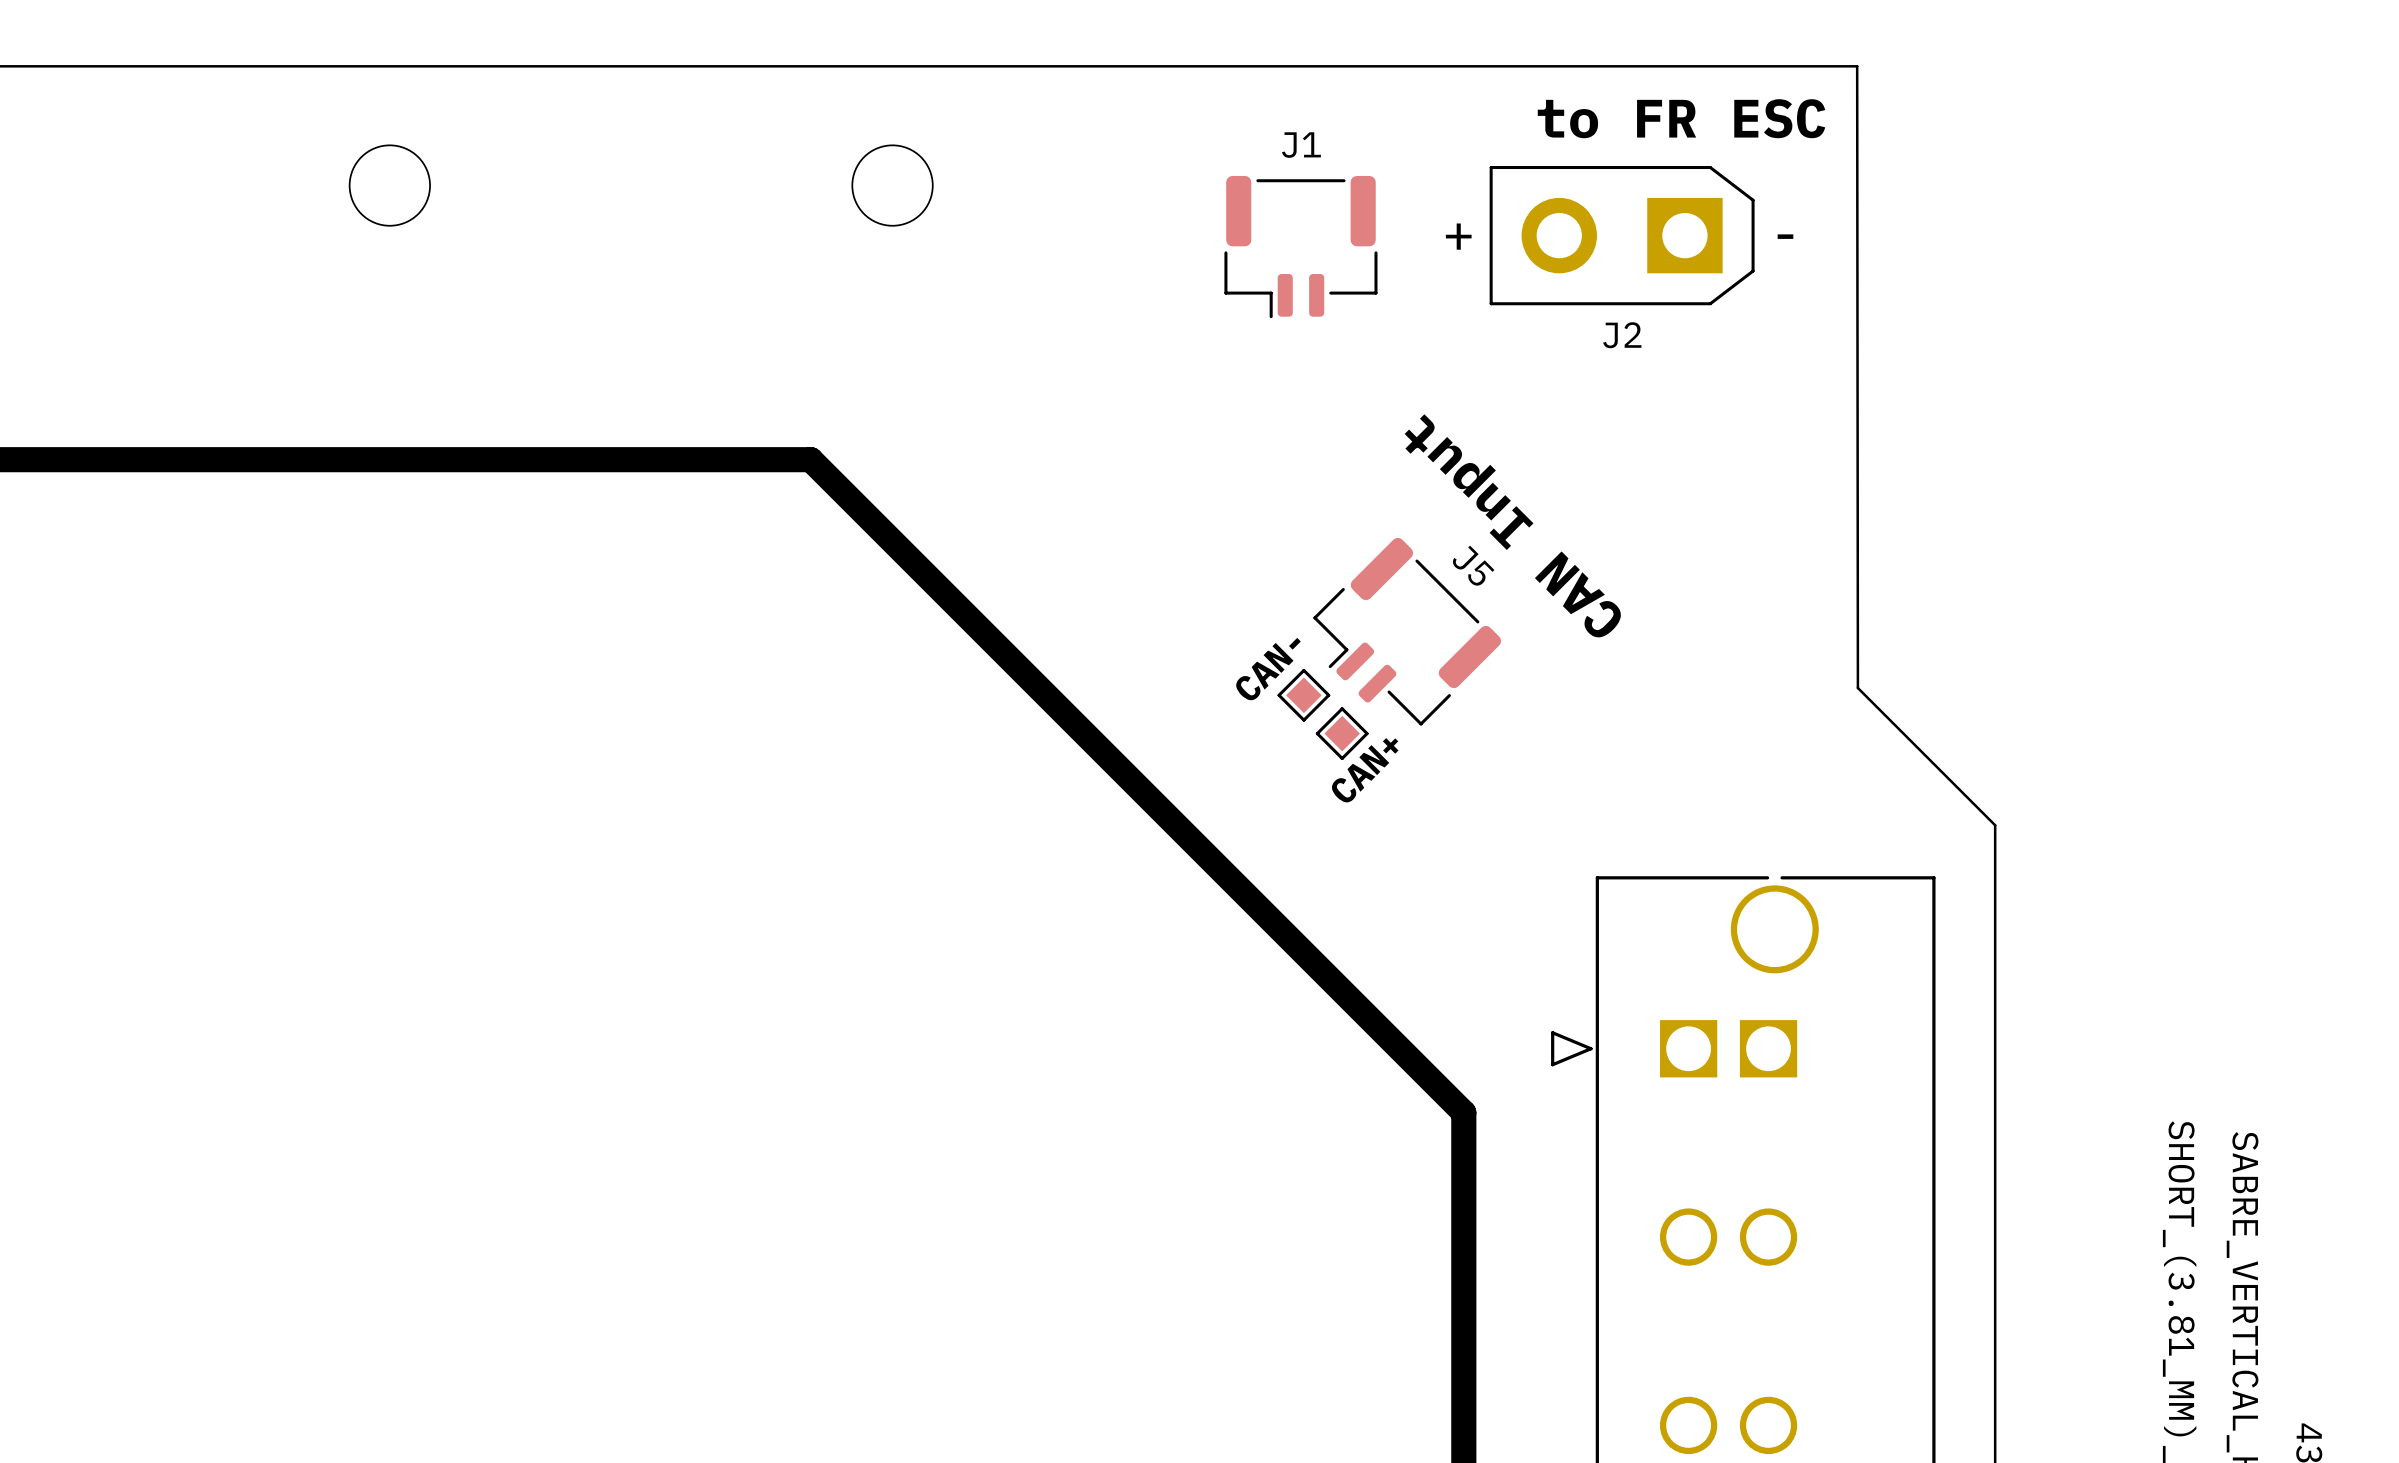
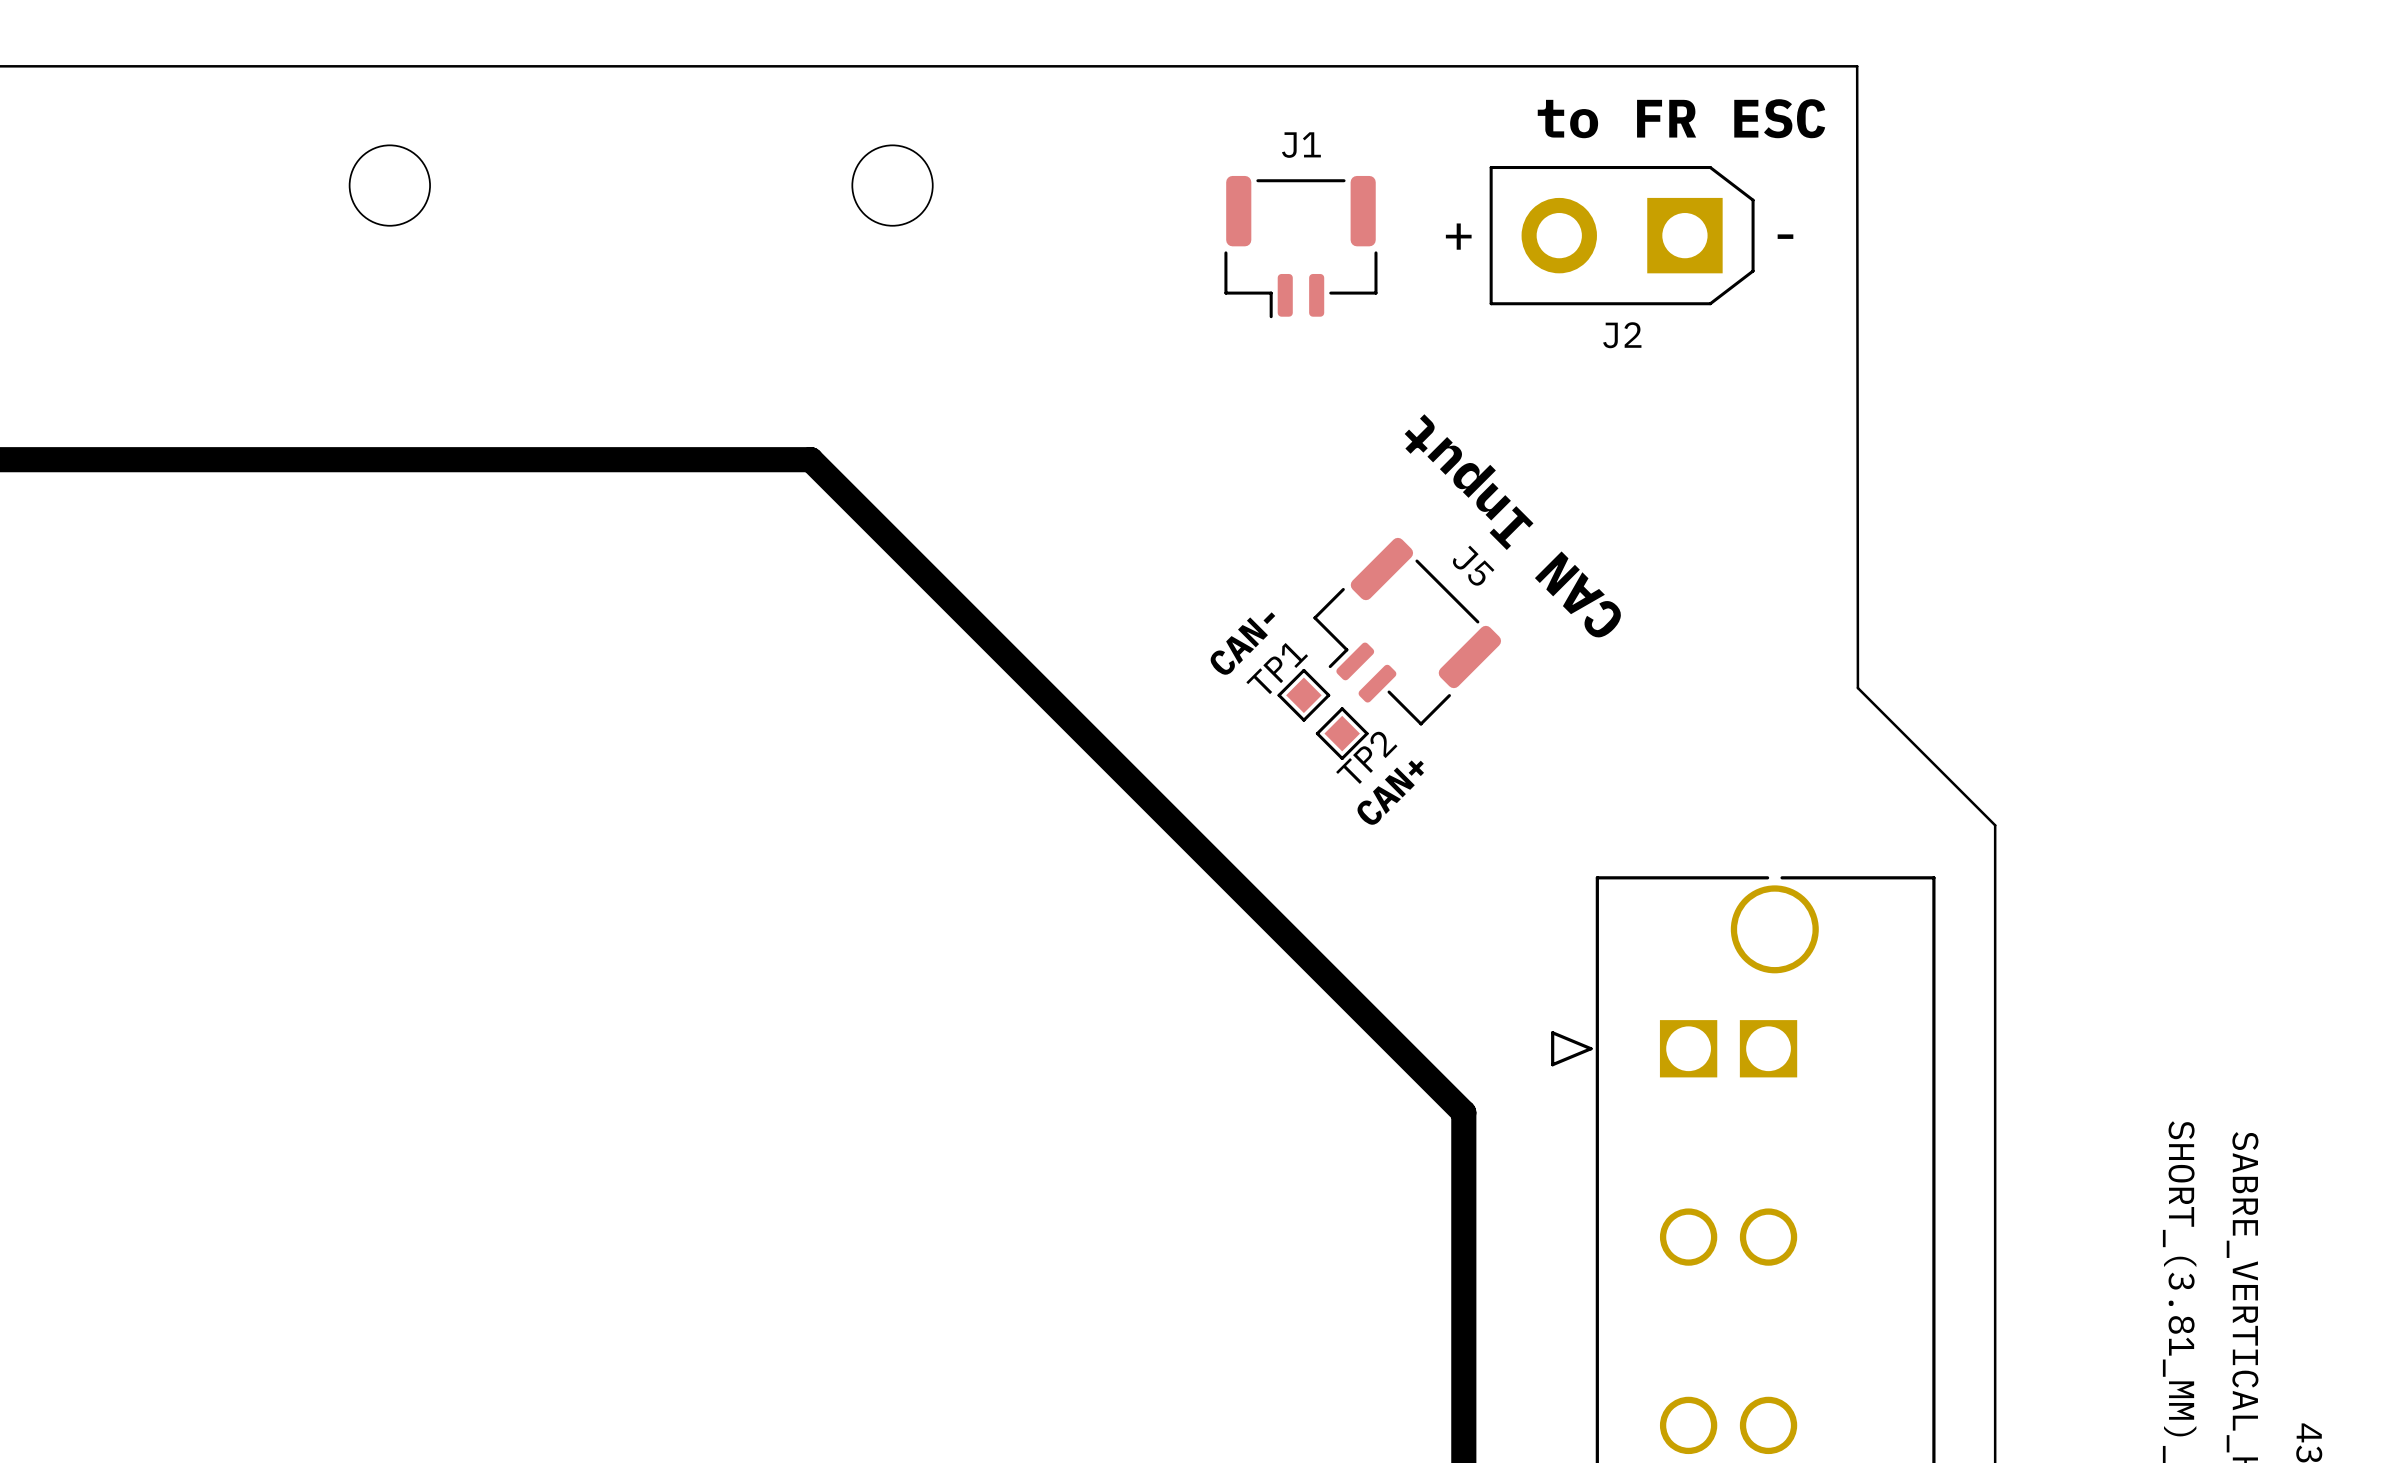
TP1 name: none -> TP1 (1277, 668)
text position: CAN- (1268, 669) -> CAN- (1242, 643)
TP2 name: none -> TP2 (1366, 757)
text position: CAN+ (1364, 770) -> CAN+ (1390, 792)

